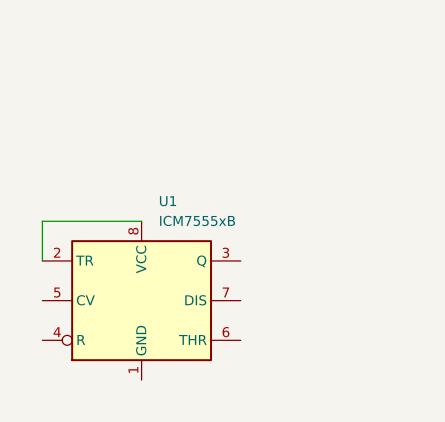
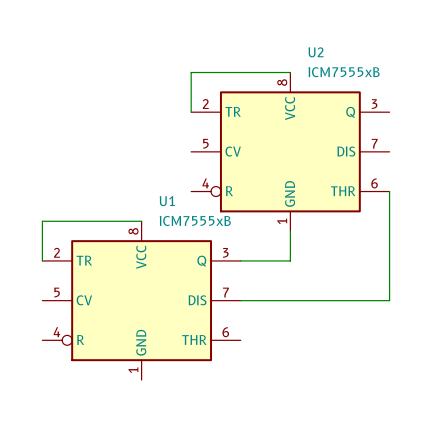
wire: none -> (290, 72) (191, 72) (191, 112)
U2: none -> ICM7555xB (290, 151)
wire: none -> (389, 191) (389, 300) (240, 300)
wire: none -> (290, 231) (290, 260) (240, 260)

